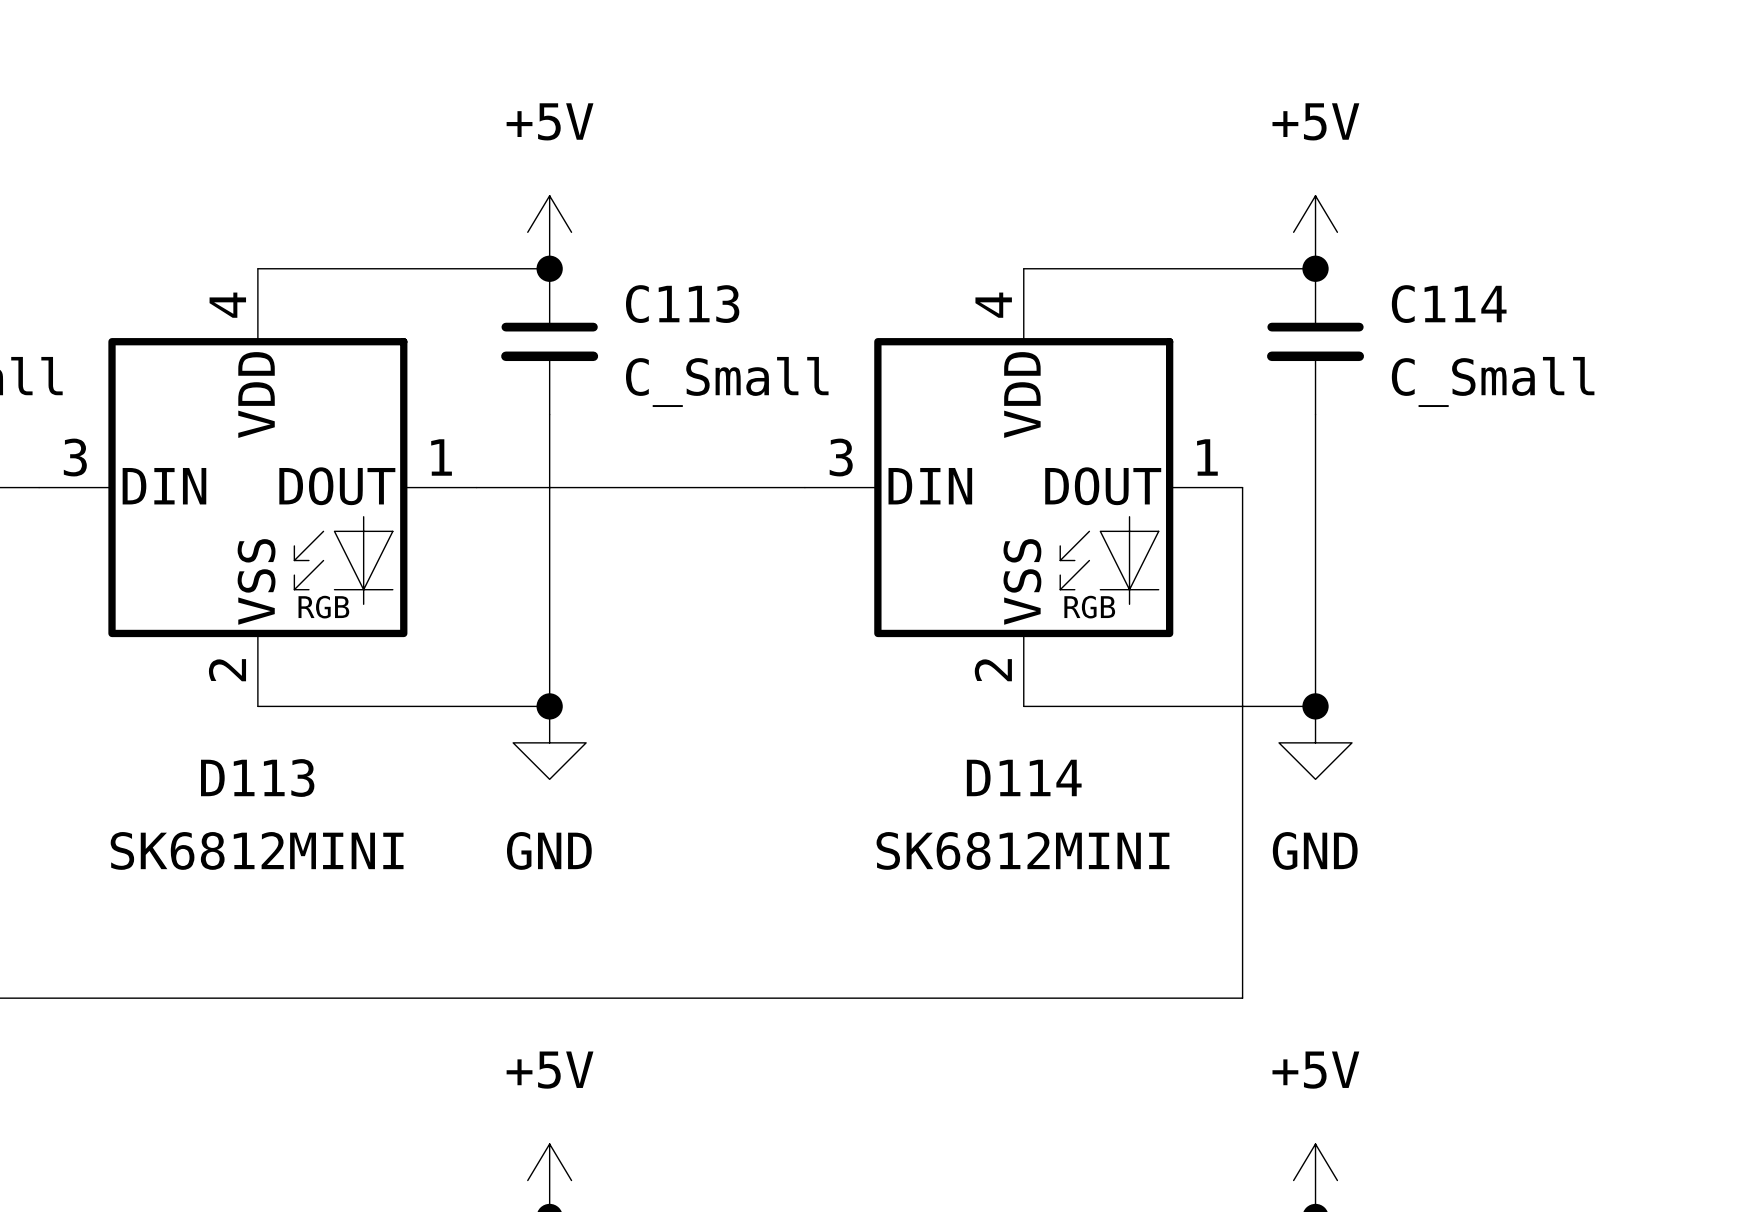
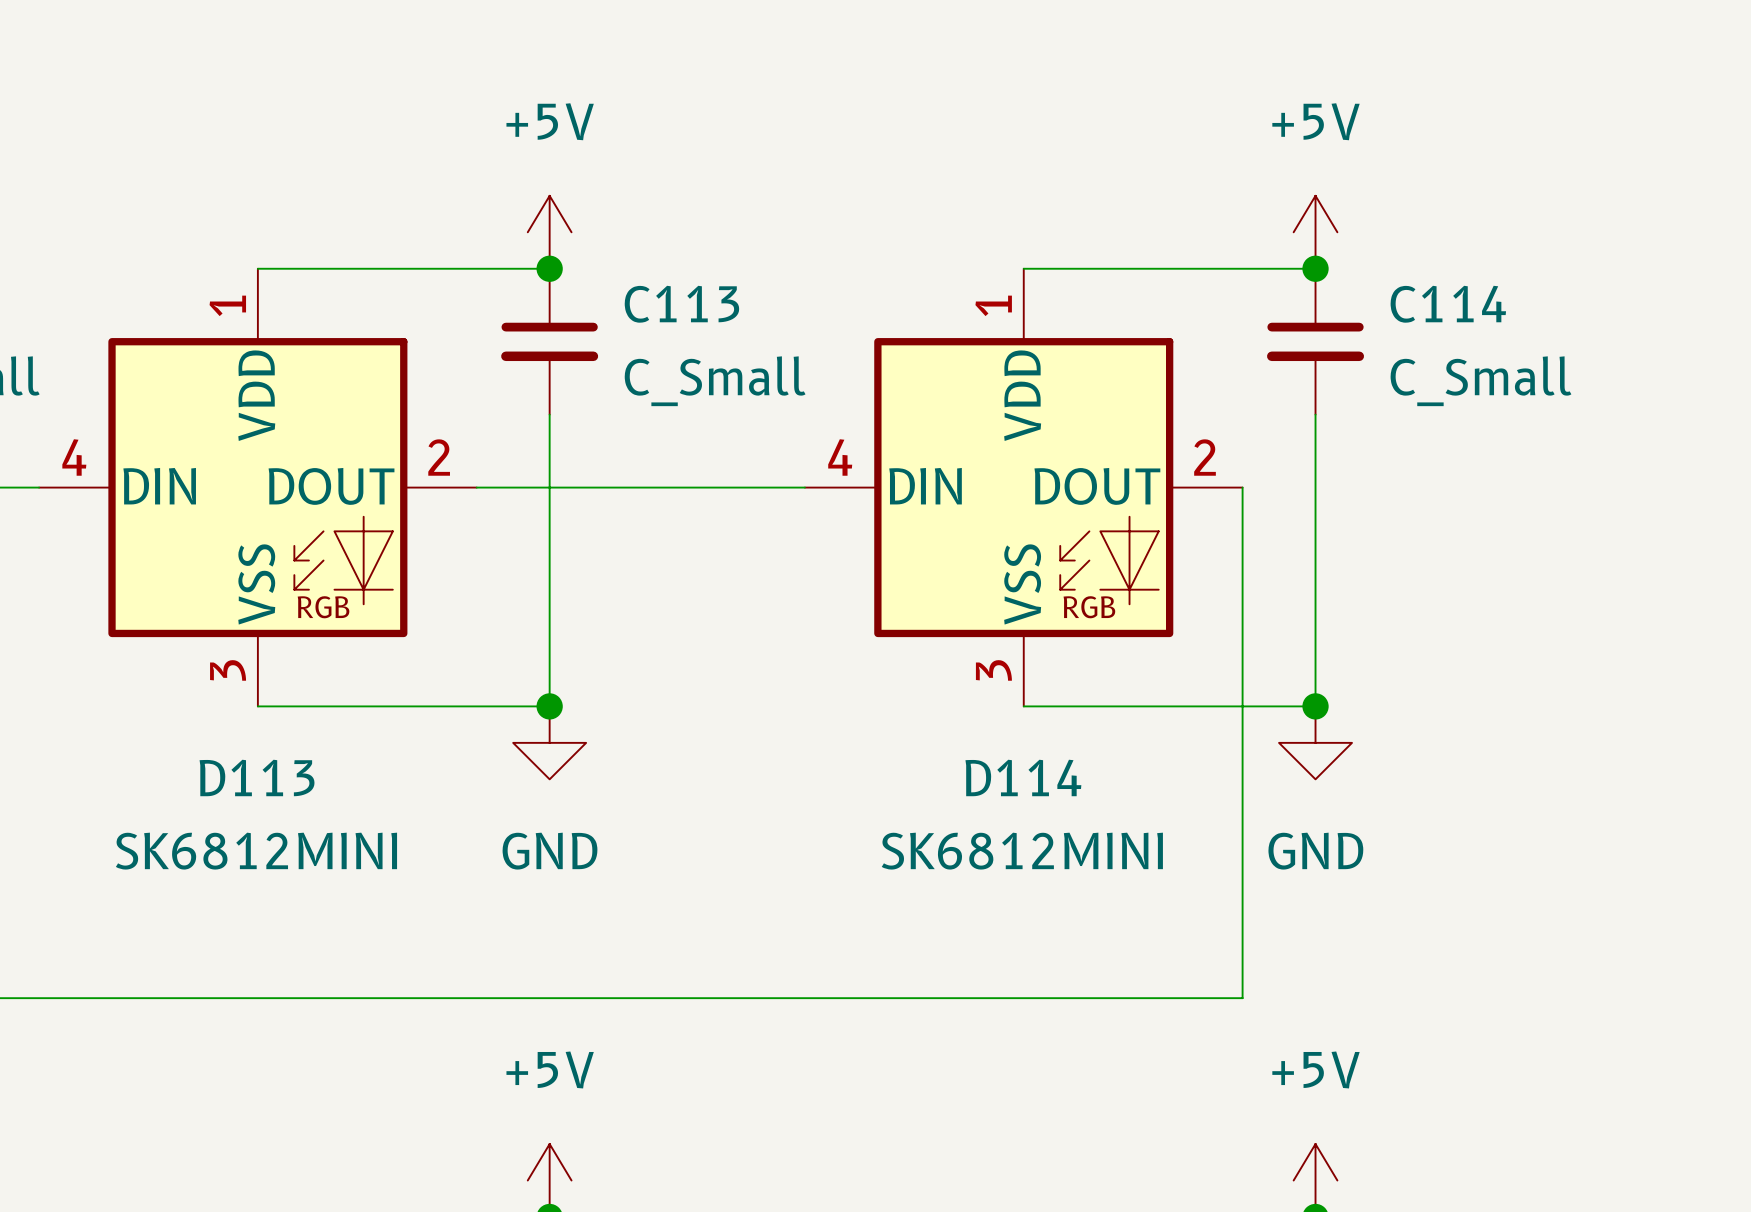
D113 pin number: 4 (227, 305) -> 1 (227, 305)
D114 pin number: 4 (993, 305) -> 1 (993, 305)
D113 pin number: 3 (75, 457) -> 4 (74, 457)
D113 pin number: 1 (441, 457) -> 2 (439, 457)
D114 pin number: 3 (841, 457) -> 4 (840, 457)
D114 pin number: 1 (1207, 457) -> 2 (1205, 457)
D113 pin number: 2 (227, 670) -> 3 (228, 670)
D114 pin number: 2 (993, 670) -> 3 (993, 670)

